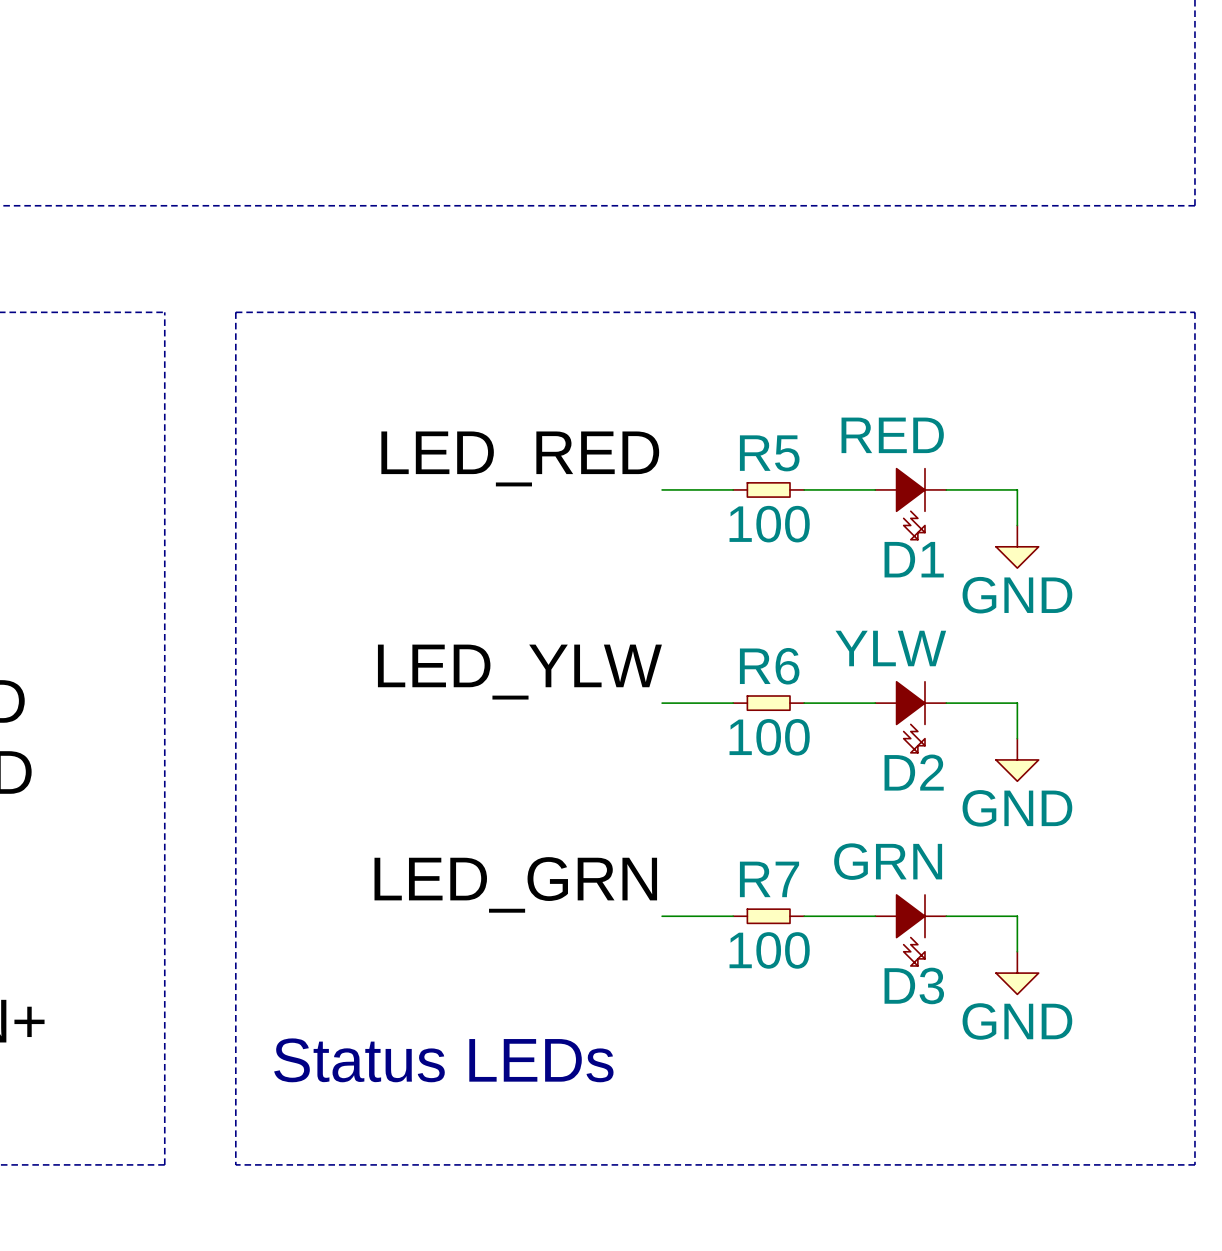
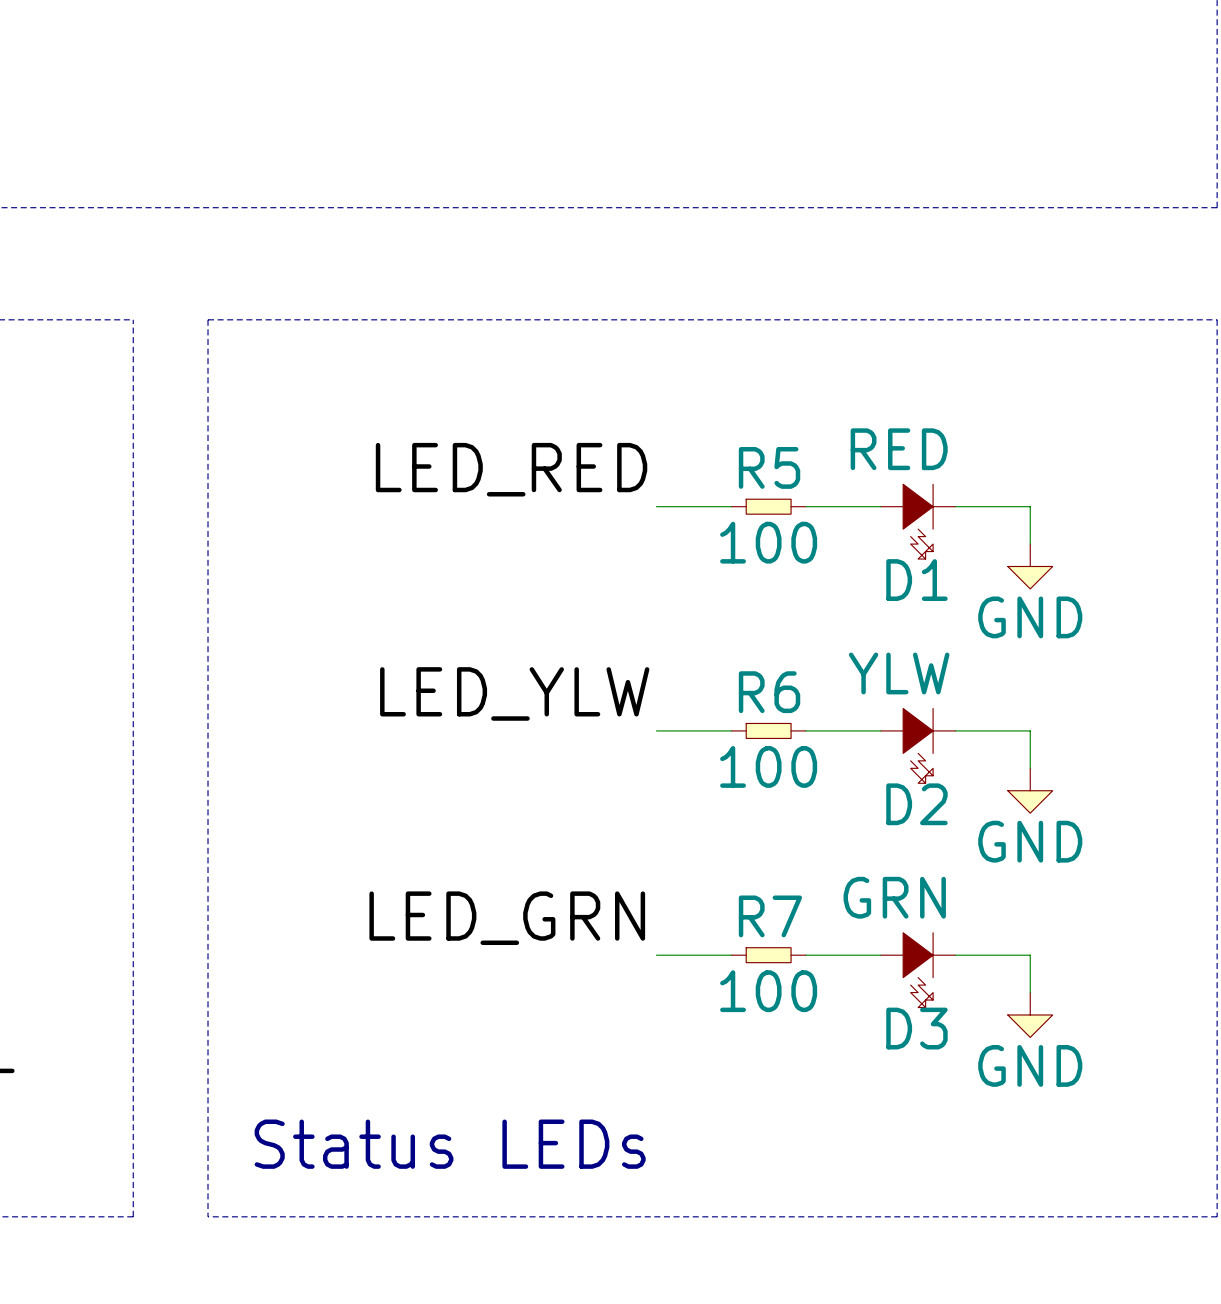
text position: Status LEDs (443, 1060) -> Status LEDs (450, 1144)

